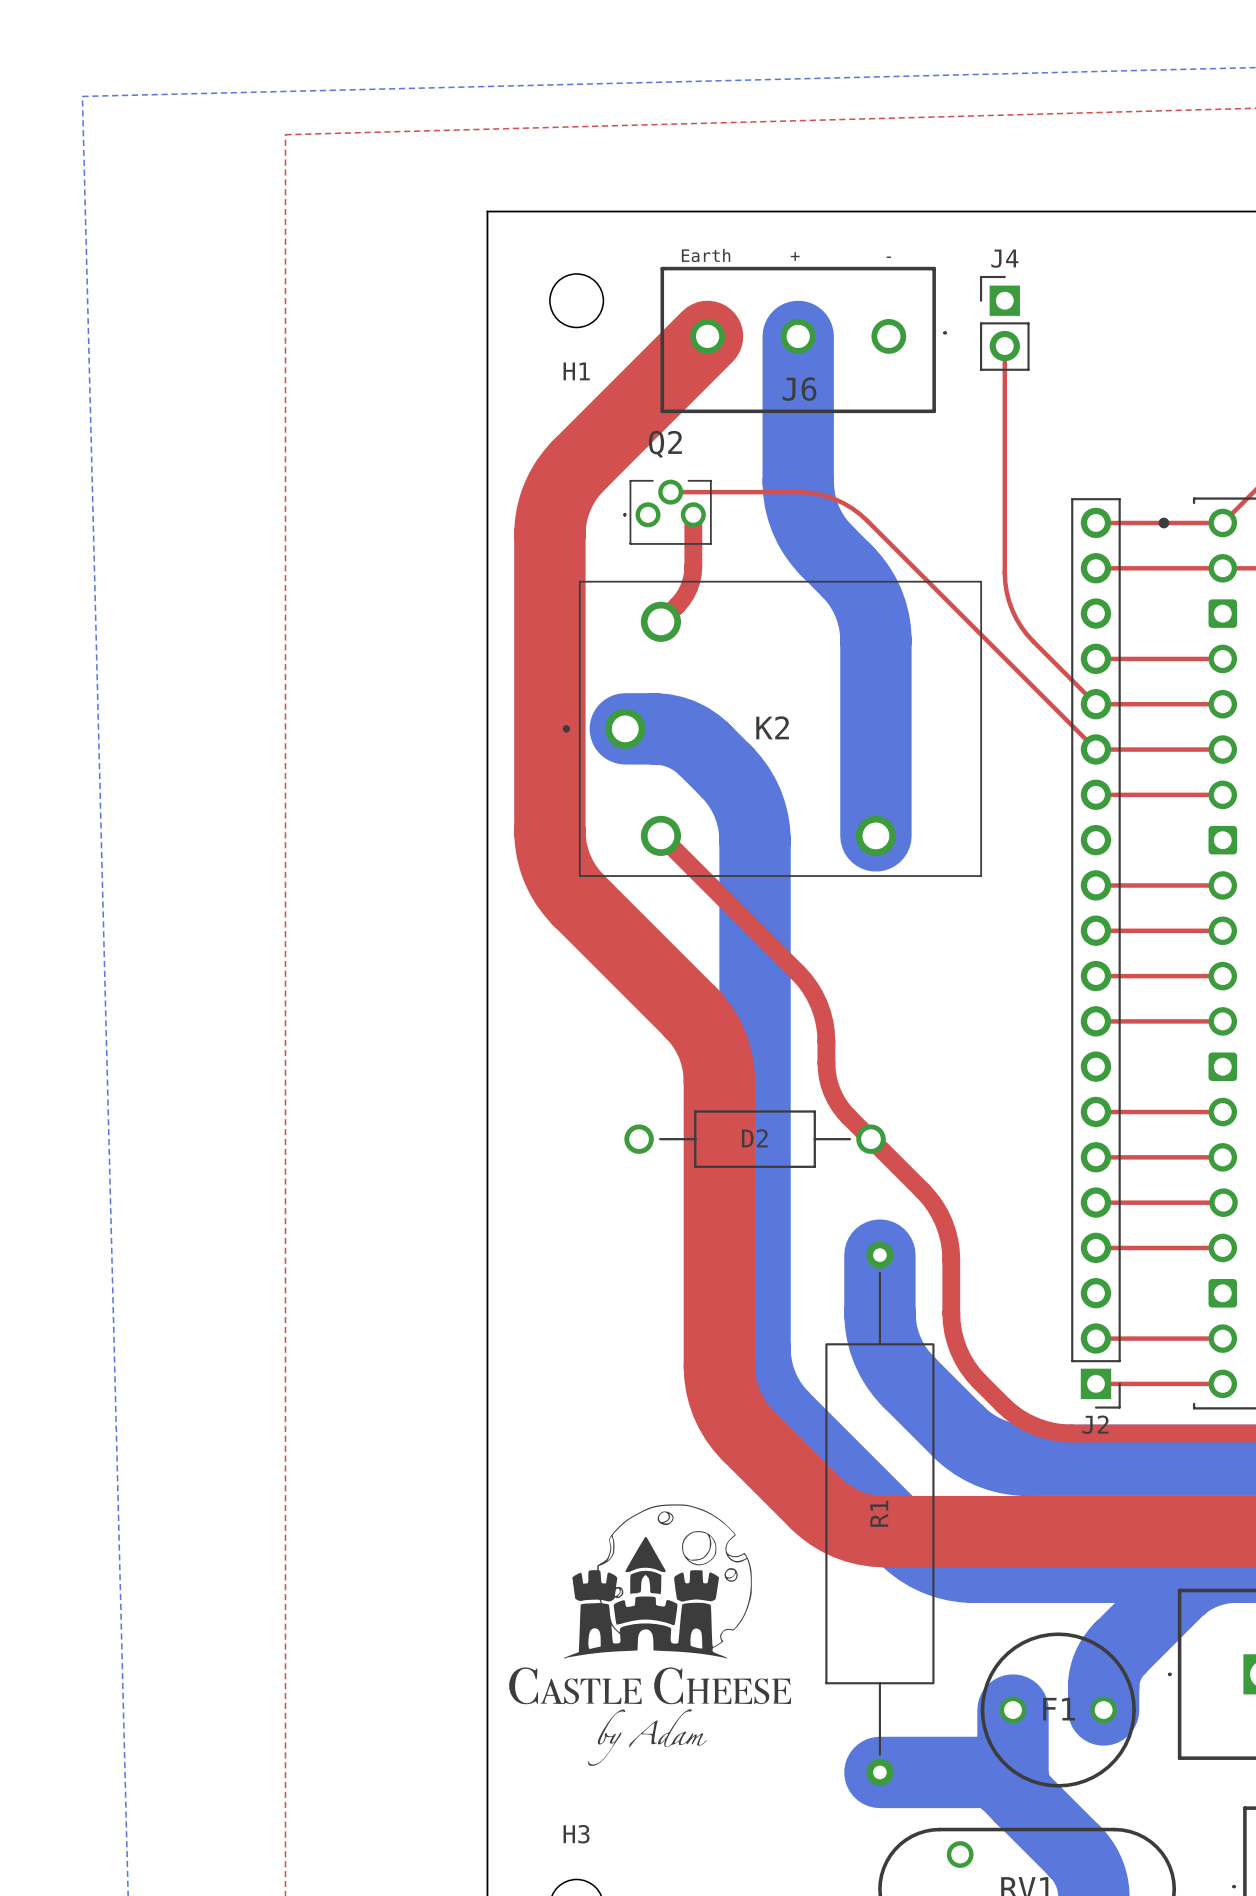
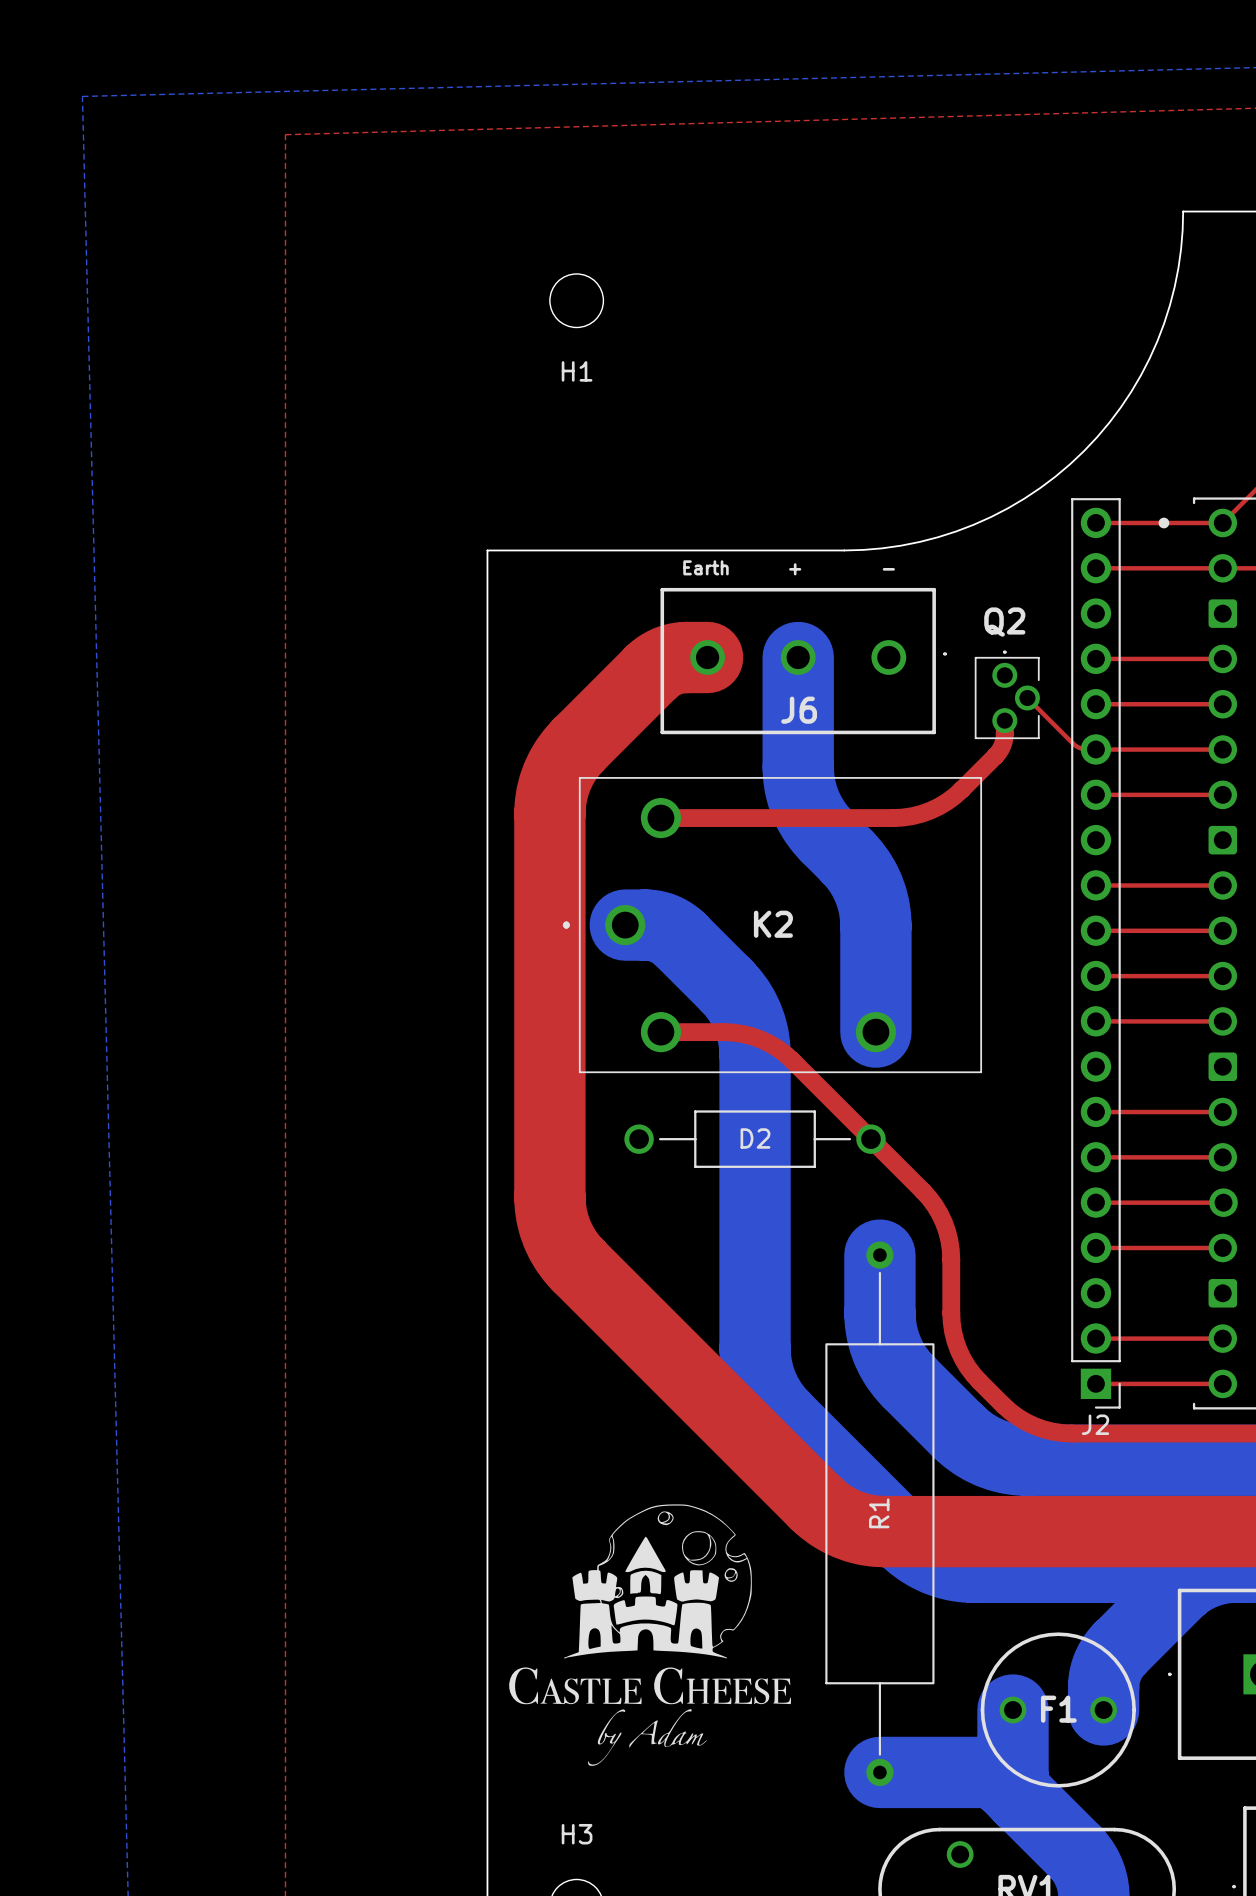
board edge: (1183, 211) (487, 211) (487, 550) -> (1183, 211) (1181, 249) (1169, 305) (1157, 341) (1131, 391) (1096, 437) (1070, 464) (1024, 498) (991, 516) (938, 537) (901, 545) (863, 549) (487, 550)
text position: Earth (706, 255) -> Earth (705, 567)
text position: + (795, 256) -> + (795, 569)
text position: - (888, 257) -> - (888, 569)
J4: (1004, 323) -> none
top track: (707, 336) (571, 472) (561, 488) (554, 506) (549, 534) (549, 813) -> (707, 657) (672, 659) (651, 672) (578, 745) (566, 759) (554, 785) (549, 813)
bottom track: (798, 336) (798, 482) (802, 510) (809, 527) (820, 543) (859, 586) (868, 603) (874, 621) (875, 640) (875, 835) -> none
J6 position: (803, 339) -> (803, 661)
top track: (1004, 346) (1004, 572) (1008, 600) (1016, 618) (1026, 634) (1095, 704) -> none
top track: (670, 492) (807, 492) (826, 496) (852, 508) (867, 520) (1095, 749) -> (1027, 698) (1074, 745) (1082, 748) (1095, 749)
Q2 rotation: 0° (667, 512) -> 90° clockwise (1007, 694)
Q2 position: (667, 512) -> (1007, 694)
top track: (693, 514) (691, 580) (681, 600) (660, 621) -> none
bottom track: none -> (798, 657) (798, 767) (800, 786) (805, 804) (814, 821) (853, 864) (864, 879) (871, 897) (875, 925) (875, 1032)
top track: none -> (1004, 720) (1003, 741) (995, 755) (954, 796) (938, 806) (921, 813) (893, 818) (660, 818)
bottom track: (625, 728) (663, 729) (689, 738) (704, 749) (733, 778) (747, 803) (753, 821) (755, 840) (755, 1054) -> (625, 925) (659, 927) (680, 939) (738, 1000) (750, 1026) (755, 1054)
K2 position: (772, 728) -> (772, 925)
top track: (549, 831) (554, 859) (561, 877) (571, 892) (697, 1019) (707, 1035) (715, 1053) (719, 1081) (719, 1376) (723, 1394) (730, 1412) (747, 1435) -> (549, 831) (549, 1197) (554, 1225) (566, 1251) (578, 1265) (747, 1435)
top track: (660, 835) (797, 972) (810, 987) (819, 1004) (824, 1022) (826, 1070) (829, 1085) (839, 1105) (848, 1116) -> (660, 1032) (733, 1032) (760, 1039) (785, 1054) (848, 1116)

